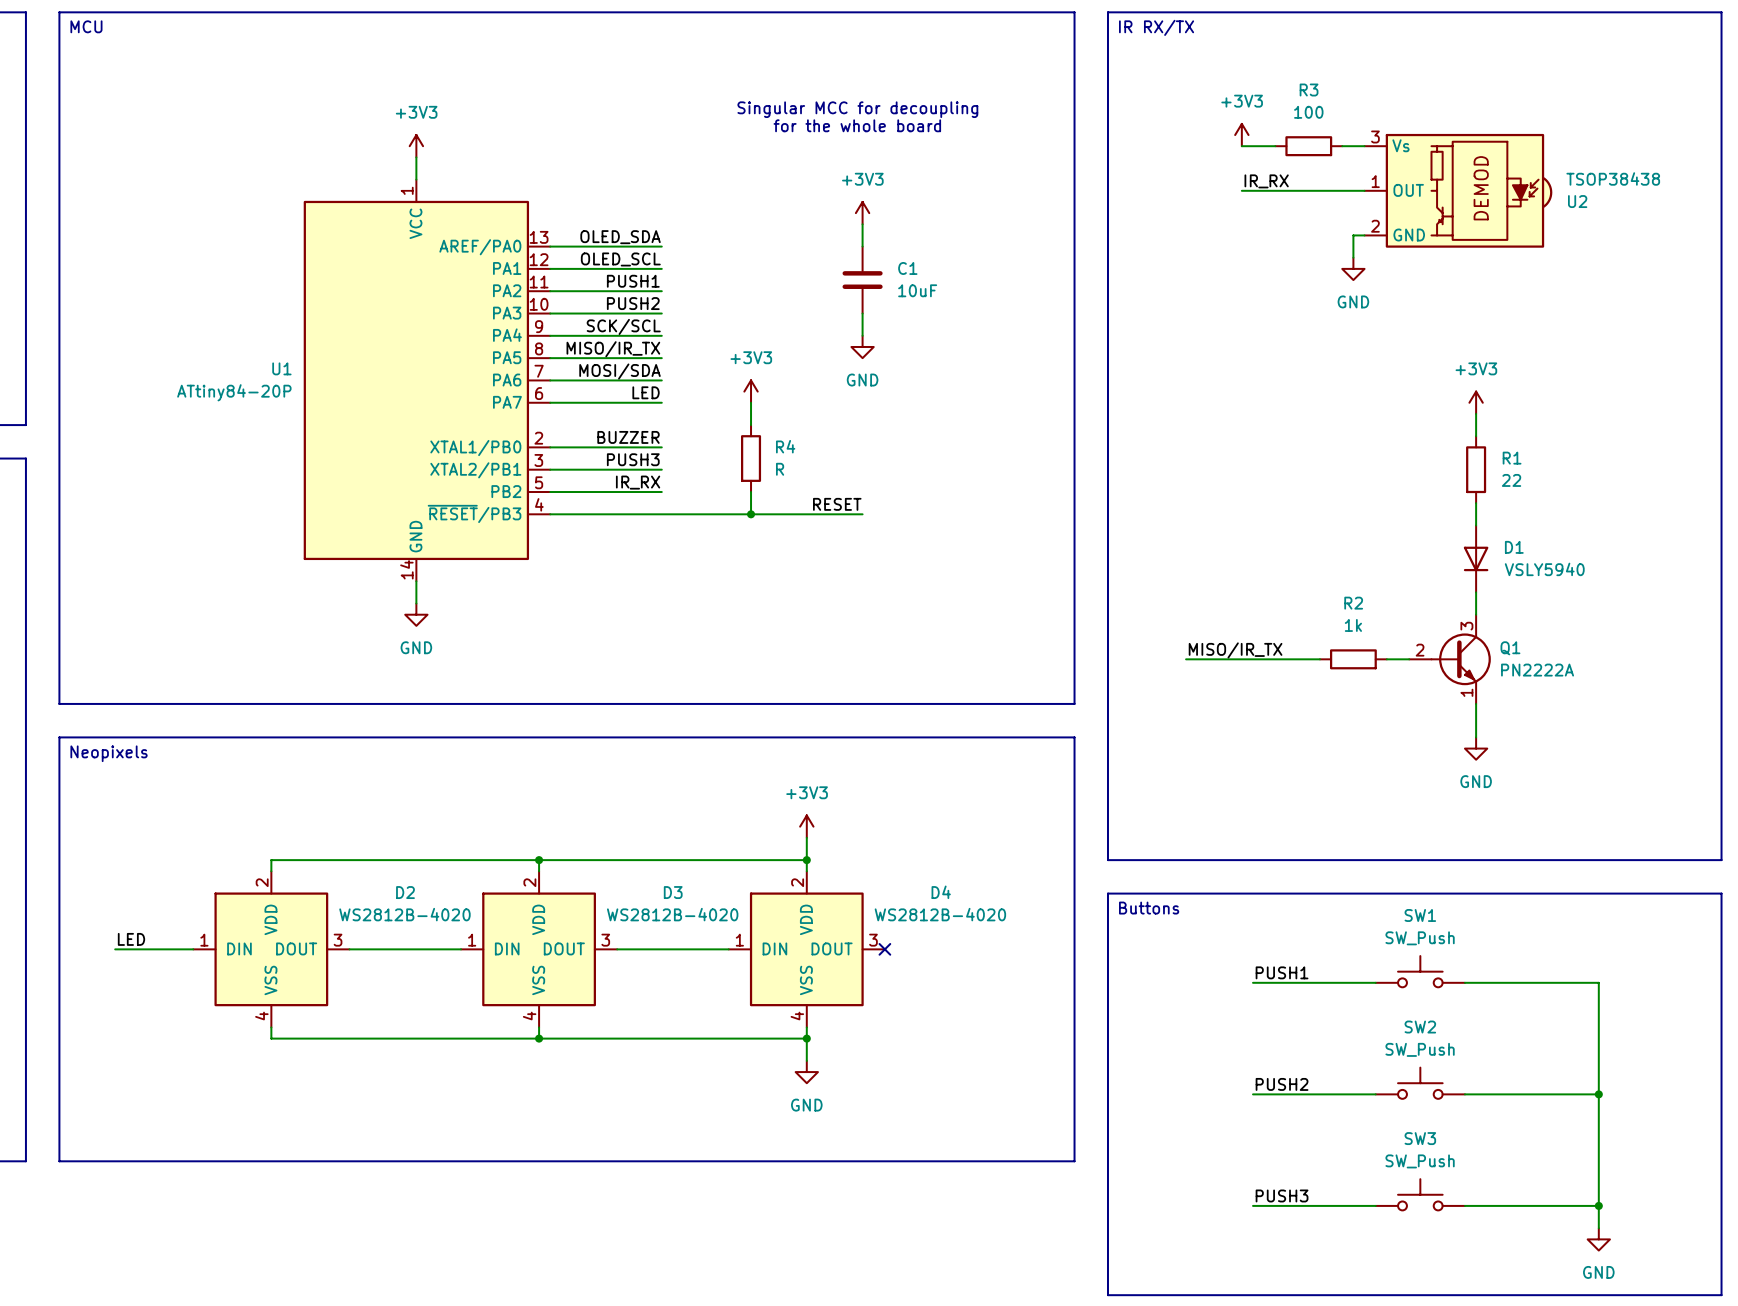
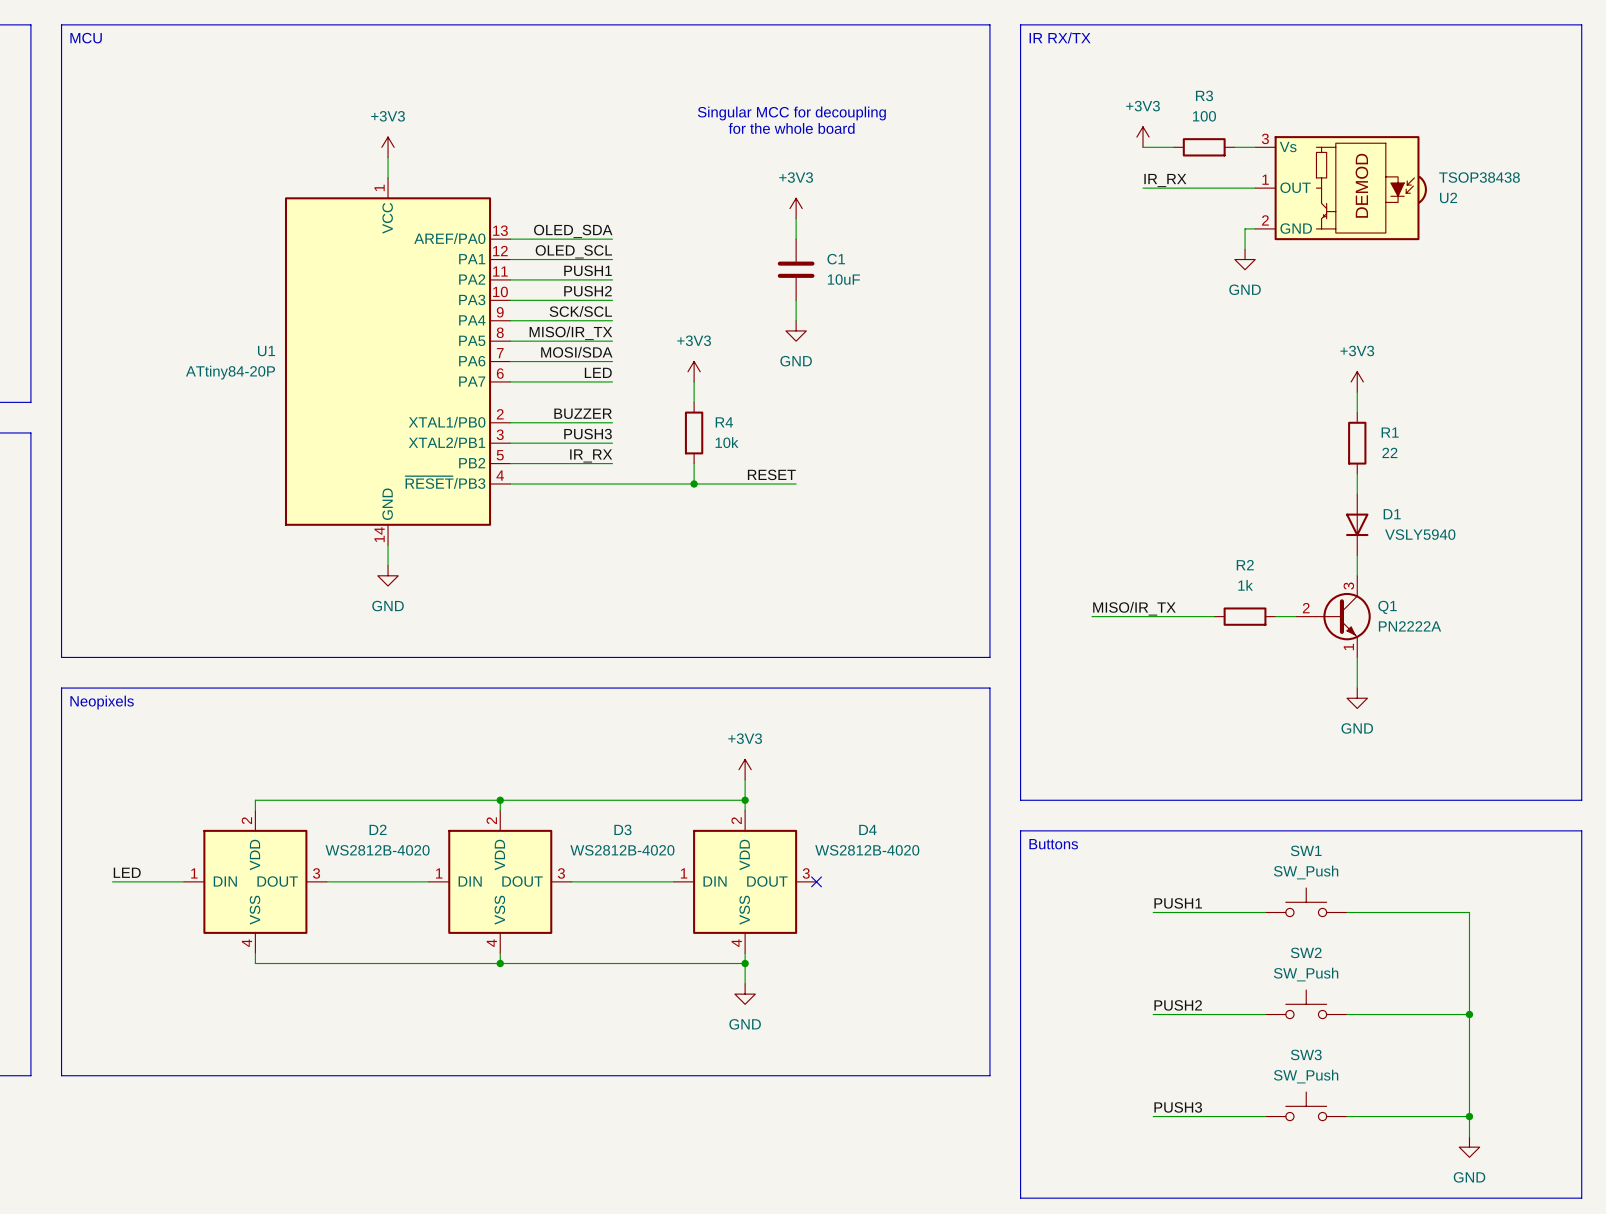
R4 value: R (780, 469) -> 10k (727, 442)

